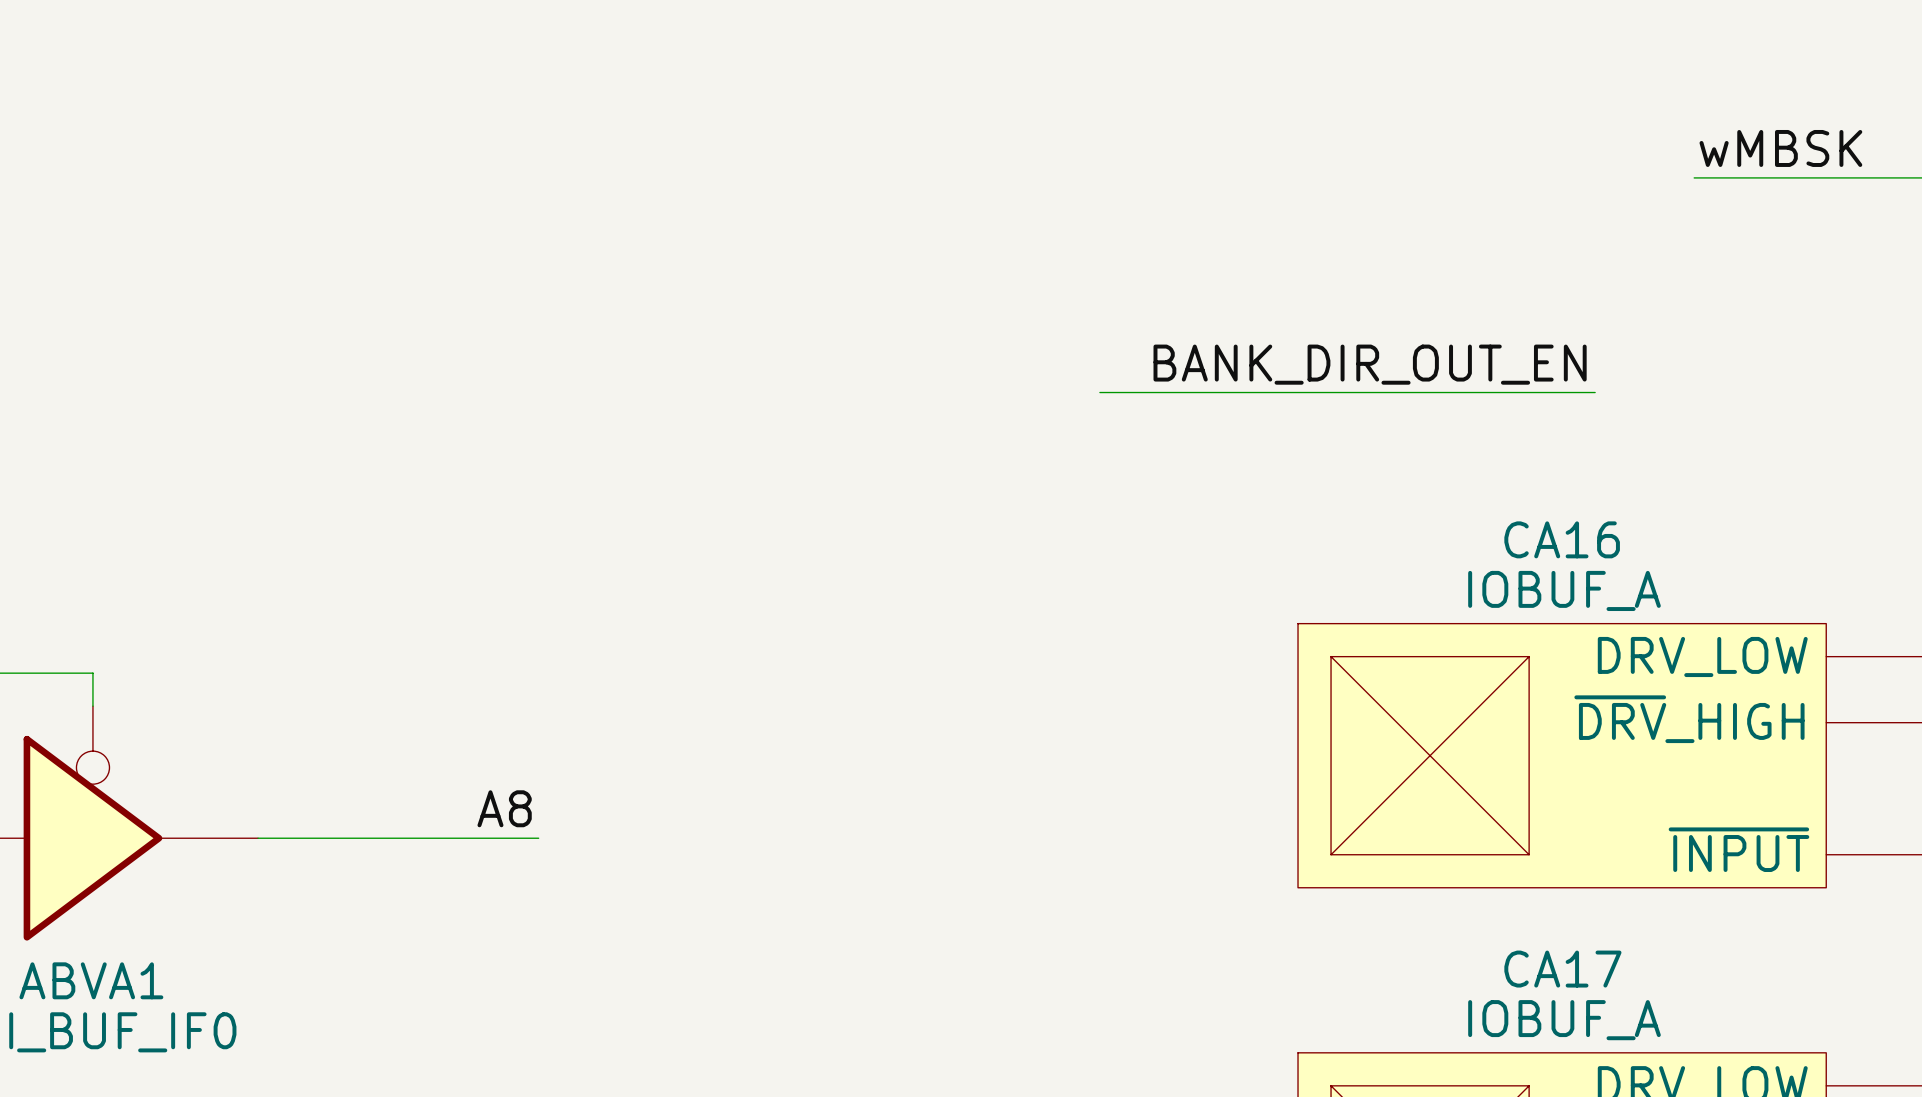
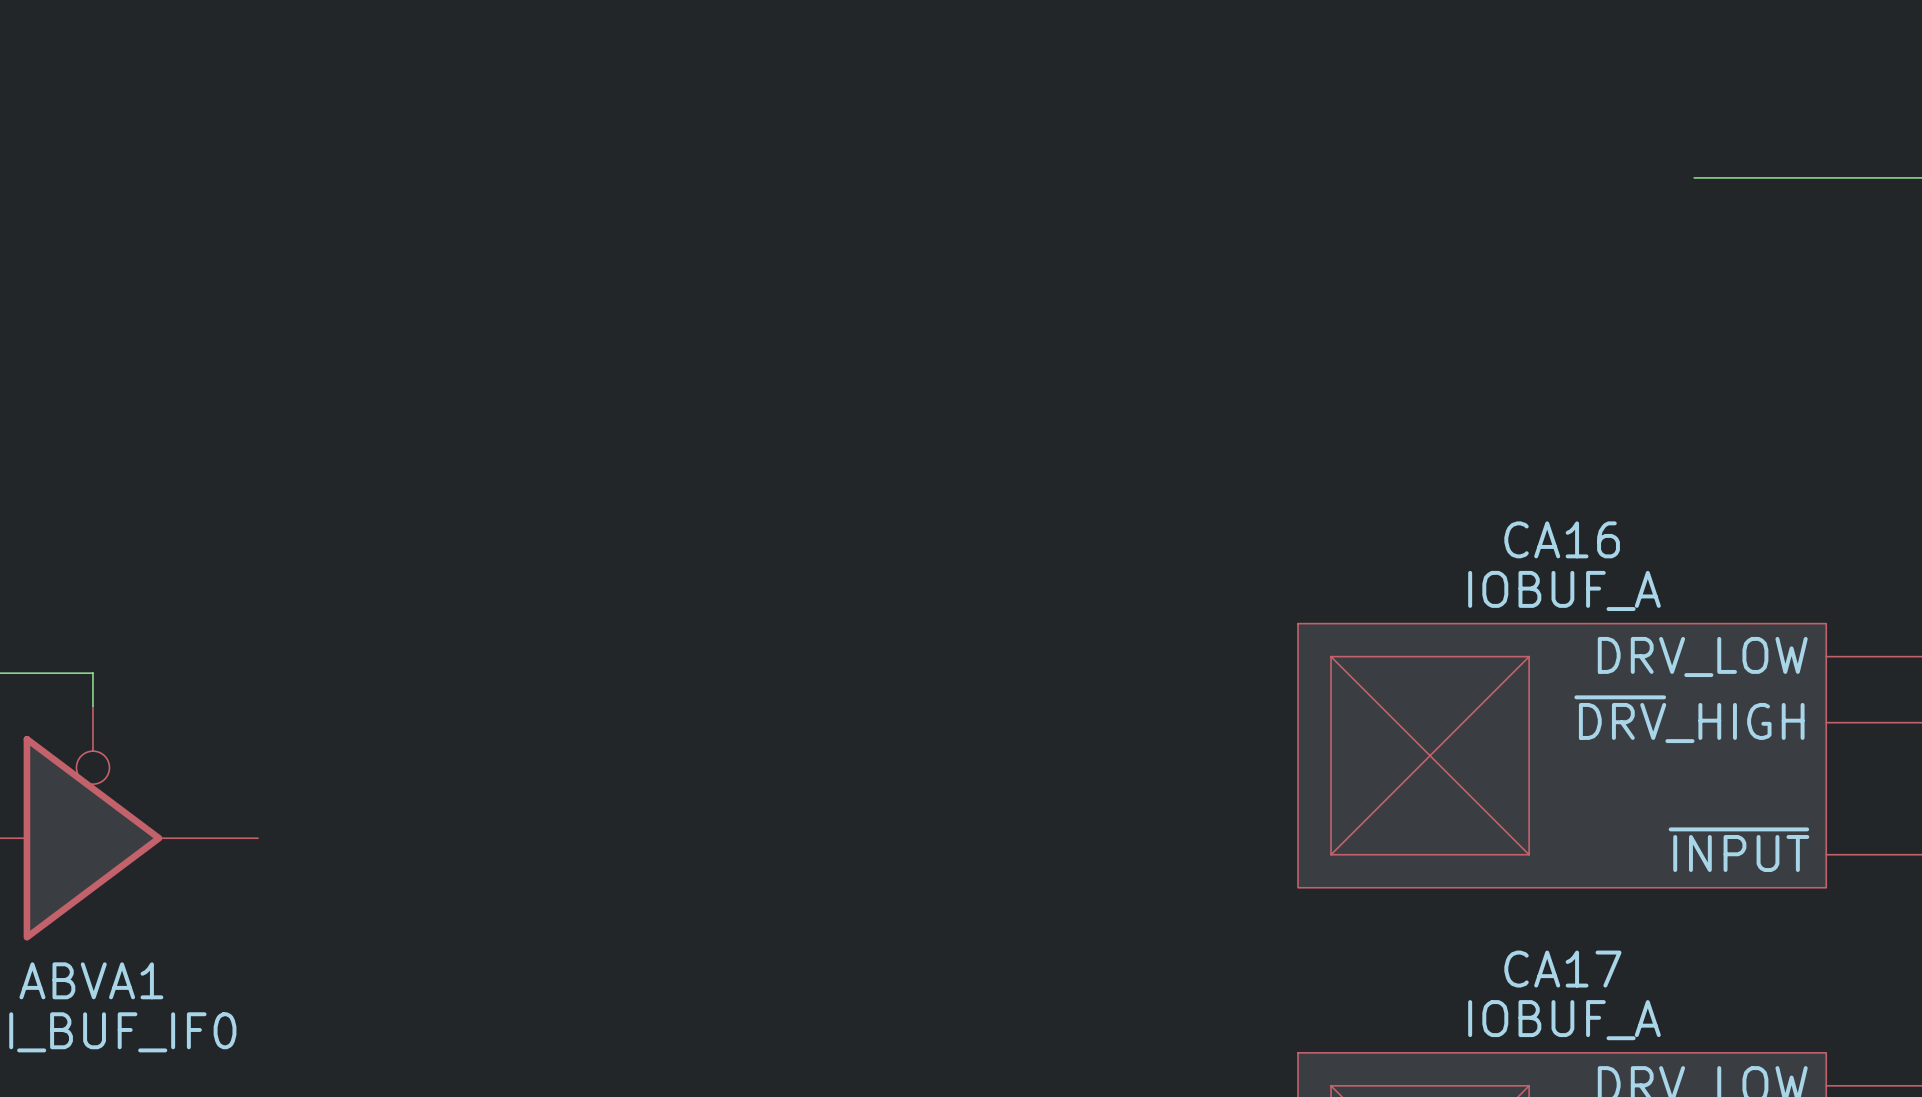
label: wMBSK (1780, 148) -> none
label: BANK_DIR_OUT_EN (1370, 364) -> none
wire: (1099, 392) (1595, 392) -> none
label: A8 (504, 808) -> none
wire: (258, 838) (538, 838) -> none

